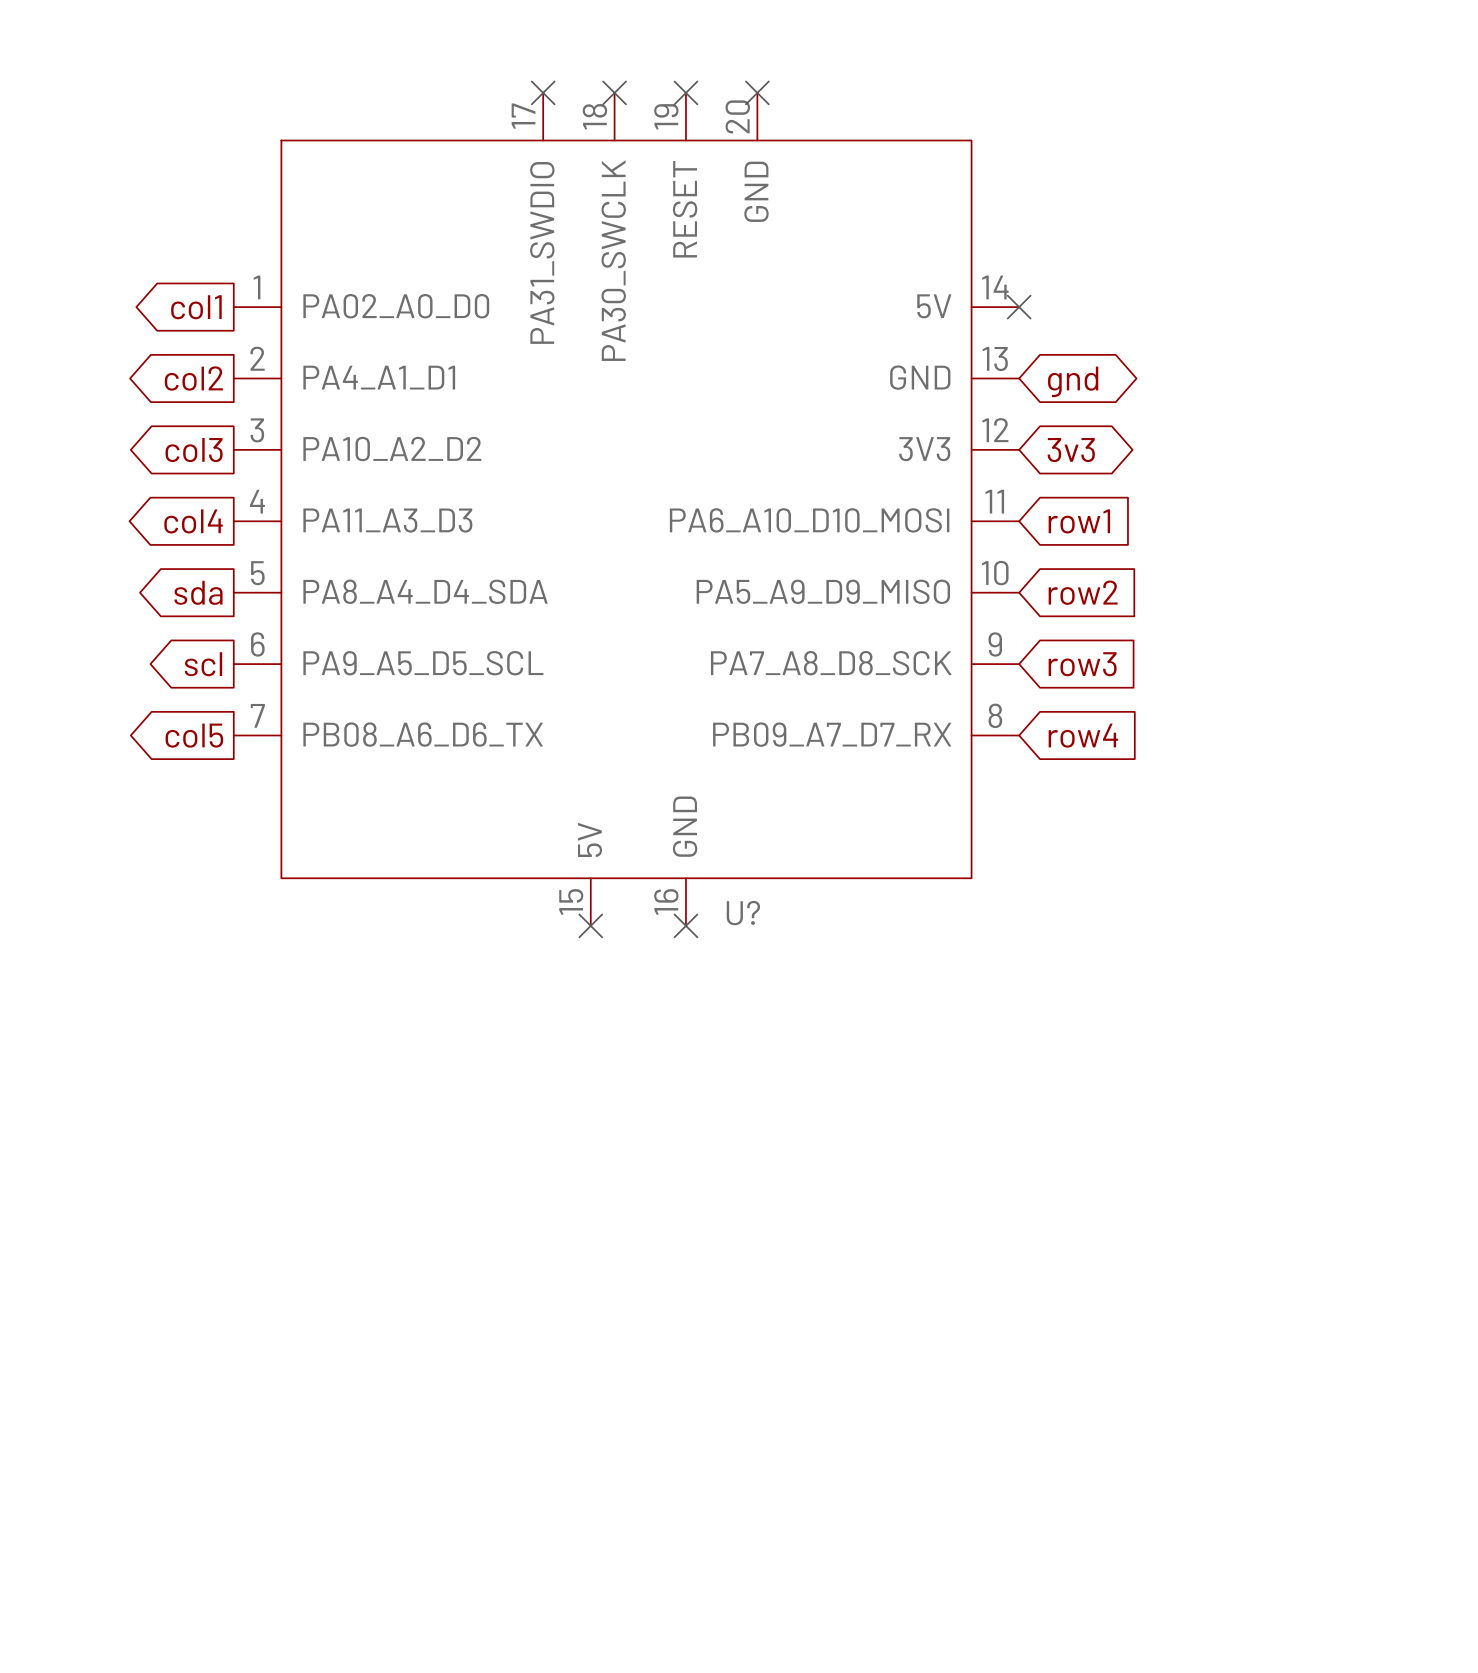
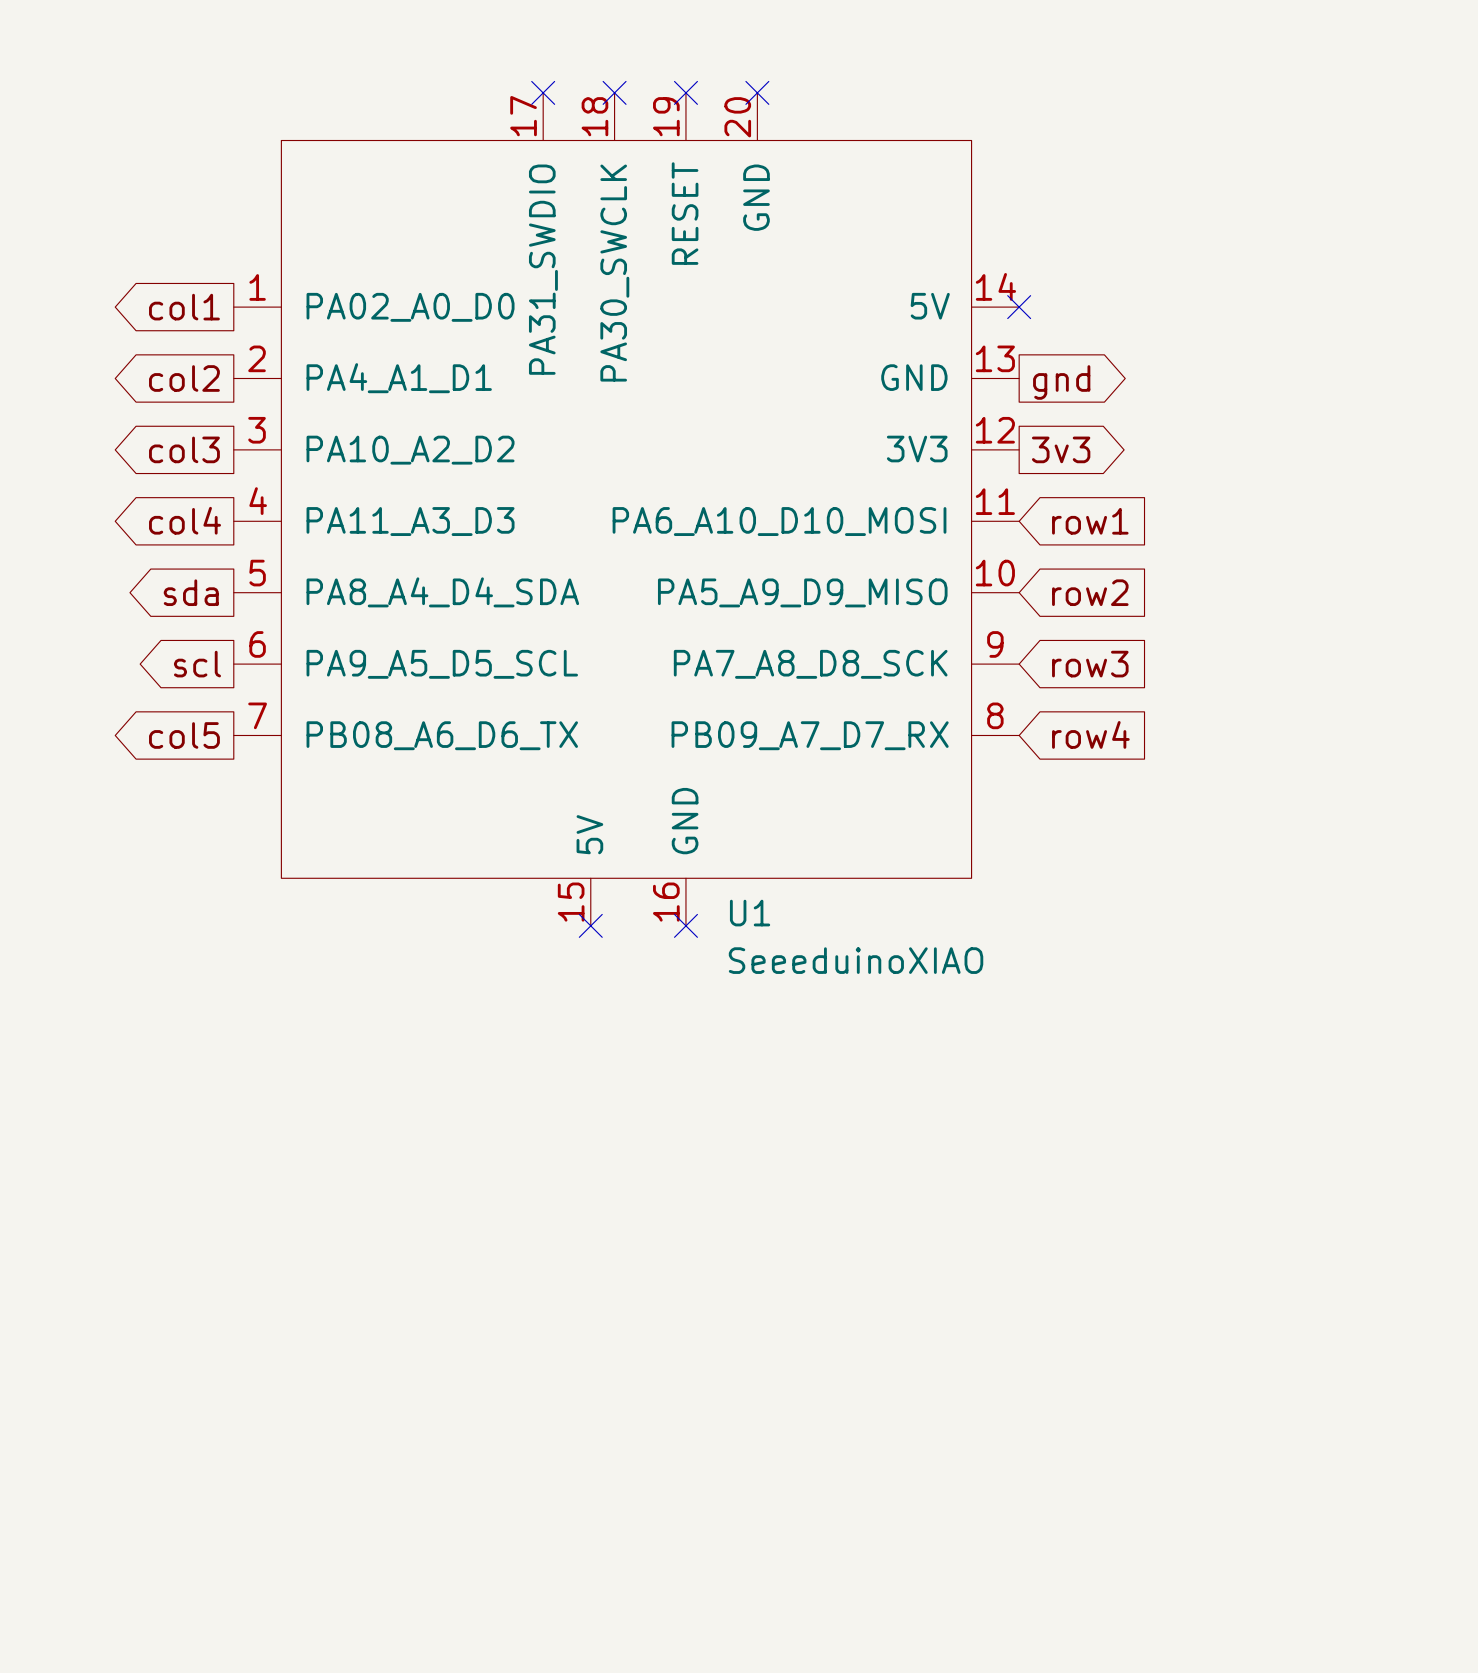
global label shape: bidirectional (1073, 381) -> output (1061, 382)
global label shape: bidirectional (1071, 450) -> output (1061, 449)
U? name: U? (743, 913) -> U1 (750, 913)
U? value: none -> SeeeduinoXIAO (856, 960)

